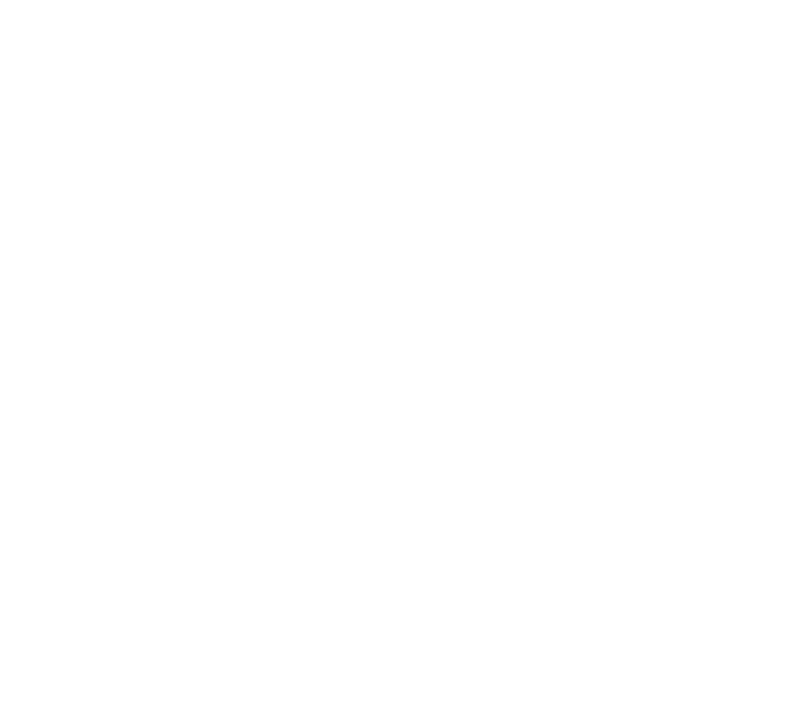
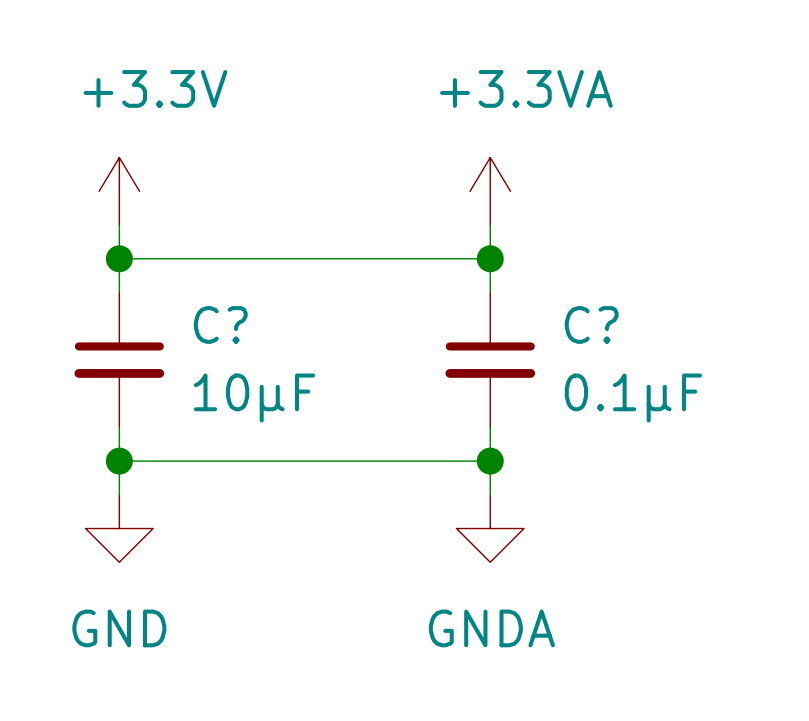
power symbol: none -> +3.3V (119, 191)
power symbol: none -> +3.3VA (490, 191)
wire: none -> (119, 225) (119, 292)
wire: none -> (490, 225) (490, 292)
wire: none -> (119, 258) (490, 258)
junction: none -> (119, 258)
junction: none -> (490, 258)
C?: none -> 10µF (119, 359)
C?: none -> 0.1µF (490, 359)
wire: none -> (119, 427) (119, 494)
wire: none -> (490, 427) (490, 494)
wire: none -> (119, 461) (490, 461)
junction: none -> (119, 461)
junction: none -> (490, 461)
power symbol: none -> GND (119, 528)
power symbol: none -> GNDA (490, 528)

